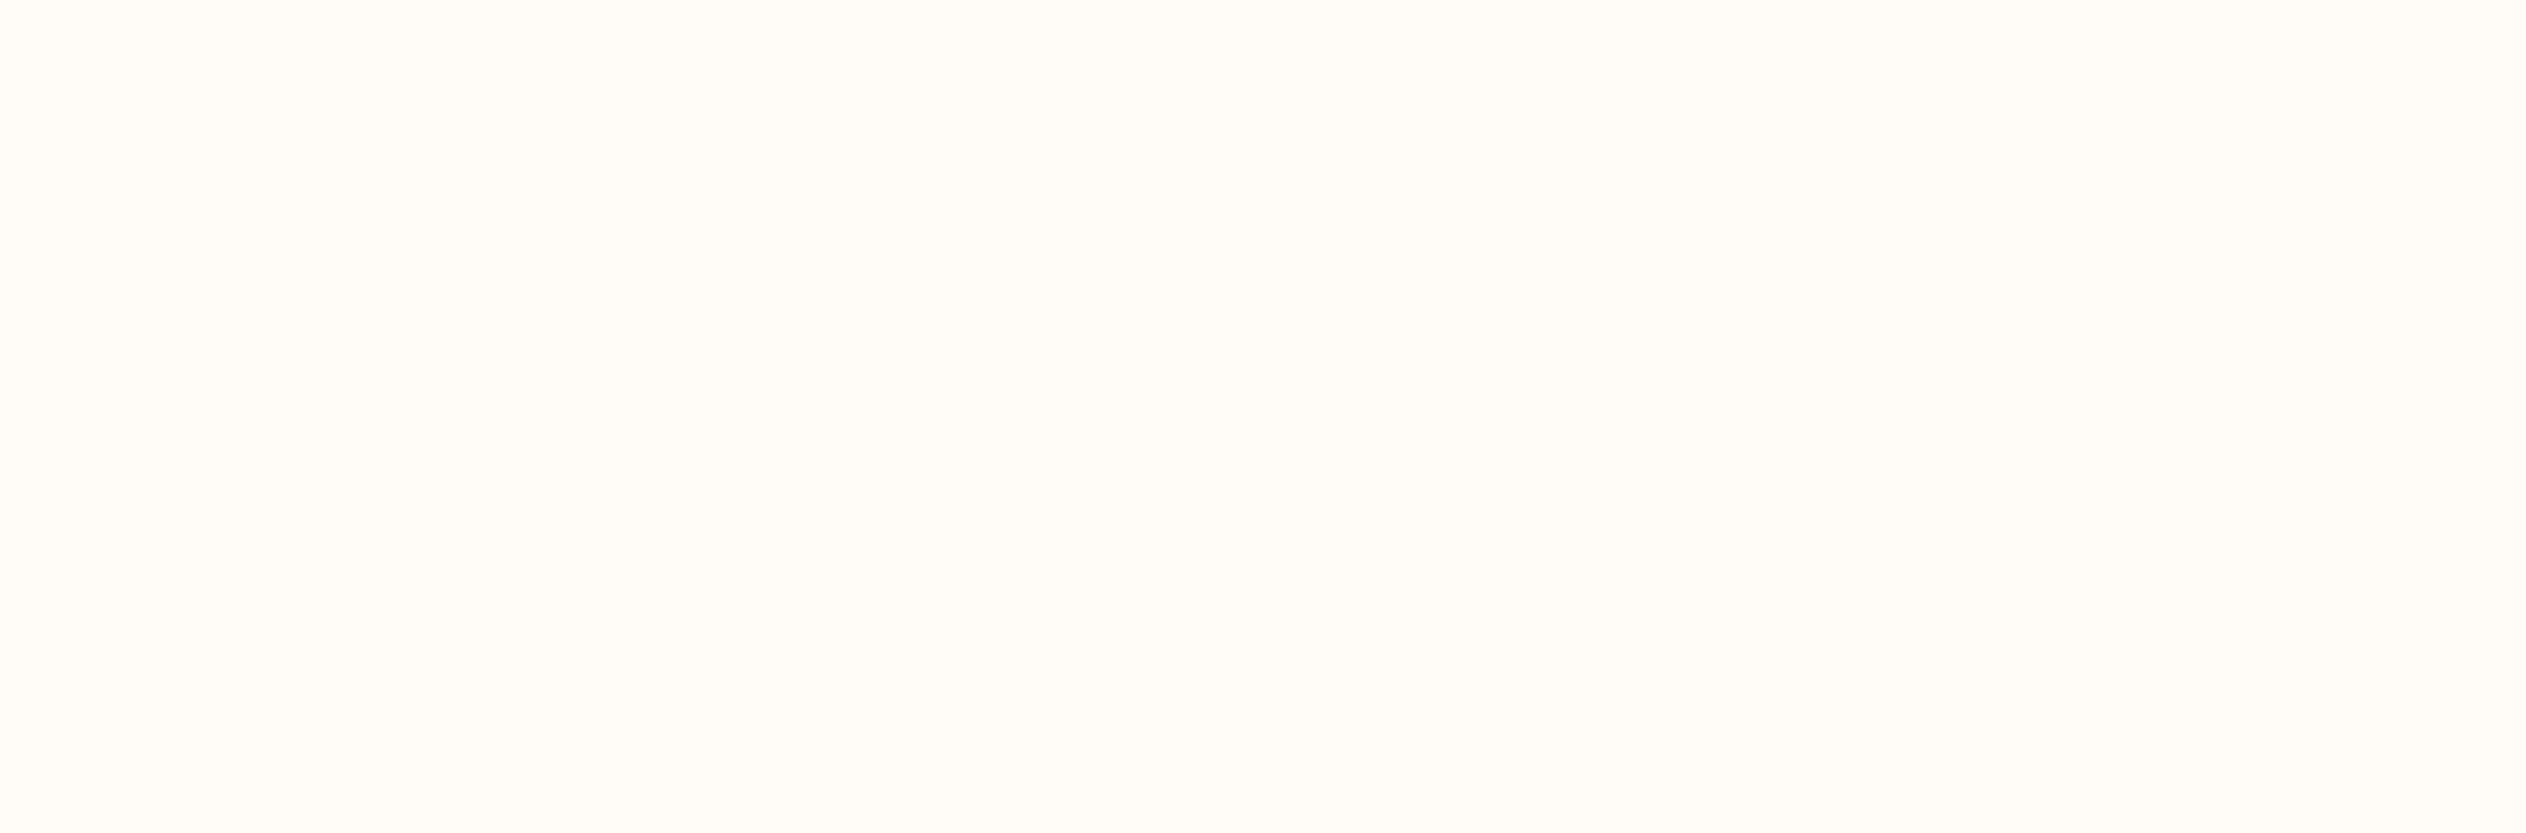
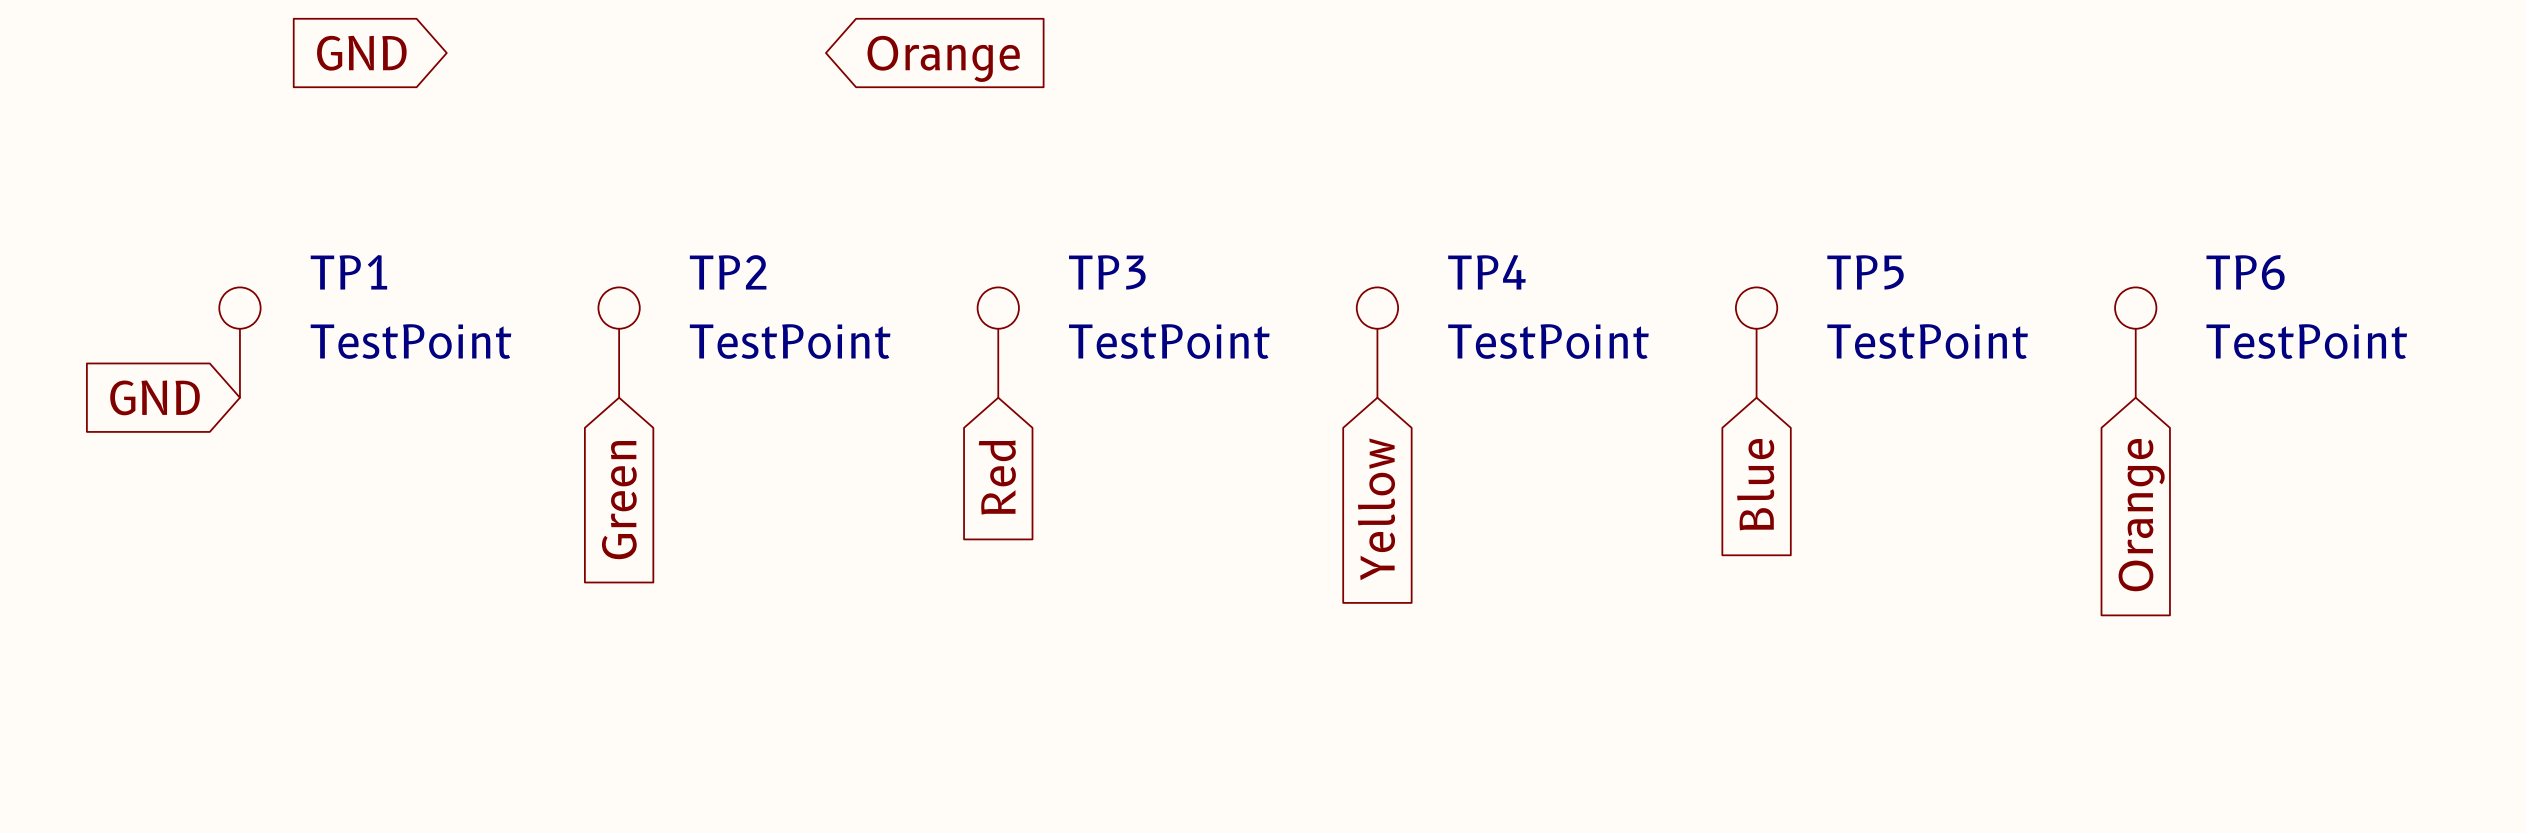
global label: none -> GND (361, 53)
global label: none -> Orange (943, 58)
TP1: none -> TestPoint (239, 342)
TP2: none -> TestPoint (619, 342)
TP3: none -> TestPoint (998, 342)
TP4: none -> TestPoint (1377, 342)
TP5: none -> TestPoint (1756, 342)
TP6: none -> TestPoint (2135, 342)
global label: none -> GND (155, 397)
global label: none -> Red (997, 477)
global label: none -> Blue (1755, 484)
global label: none -> Green (619, 500)
global label: none -> Yellow (1376, 509)
global label: none -> Orange (2141, 515)

